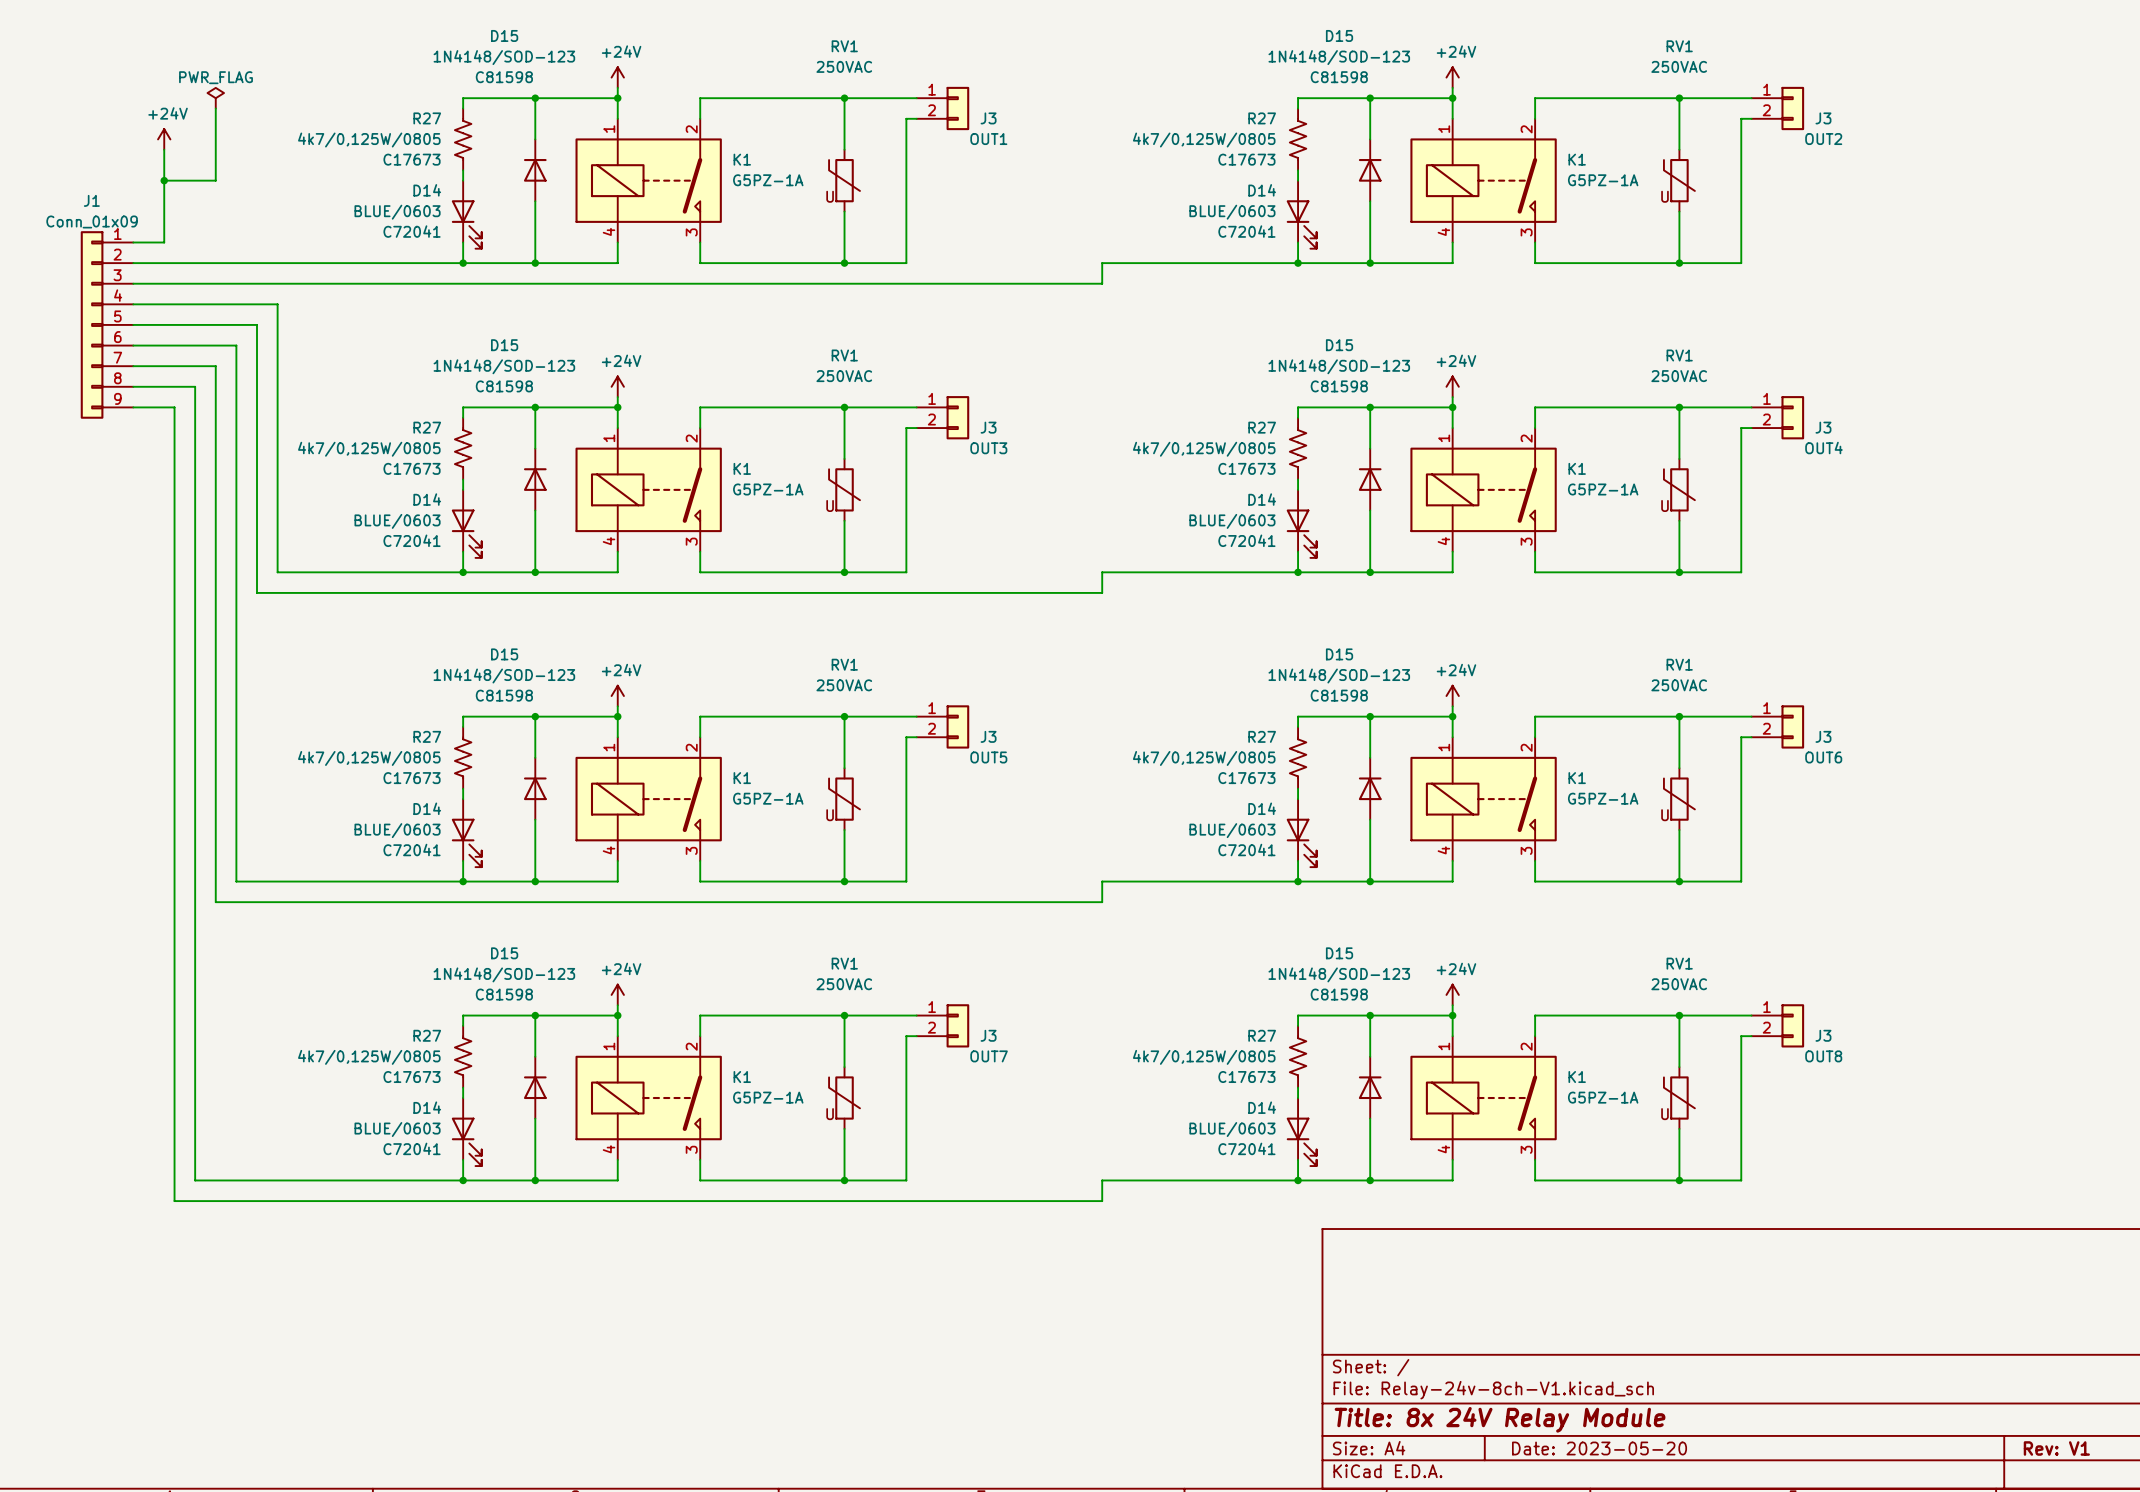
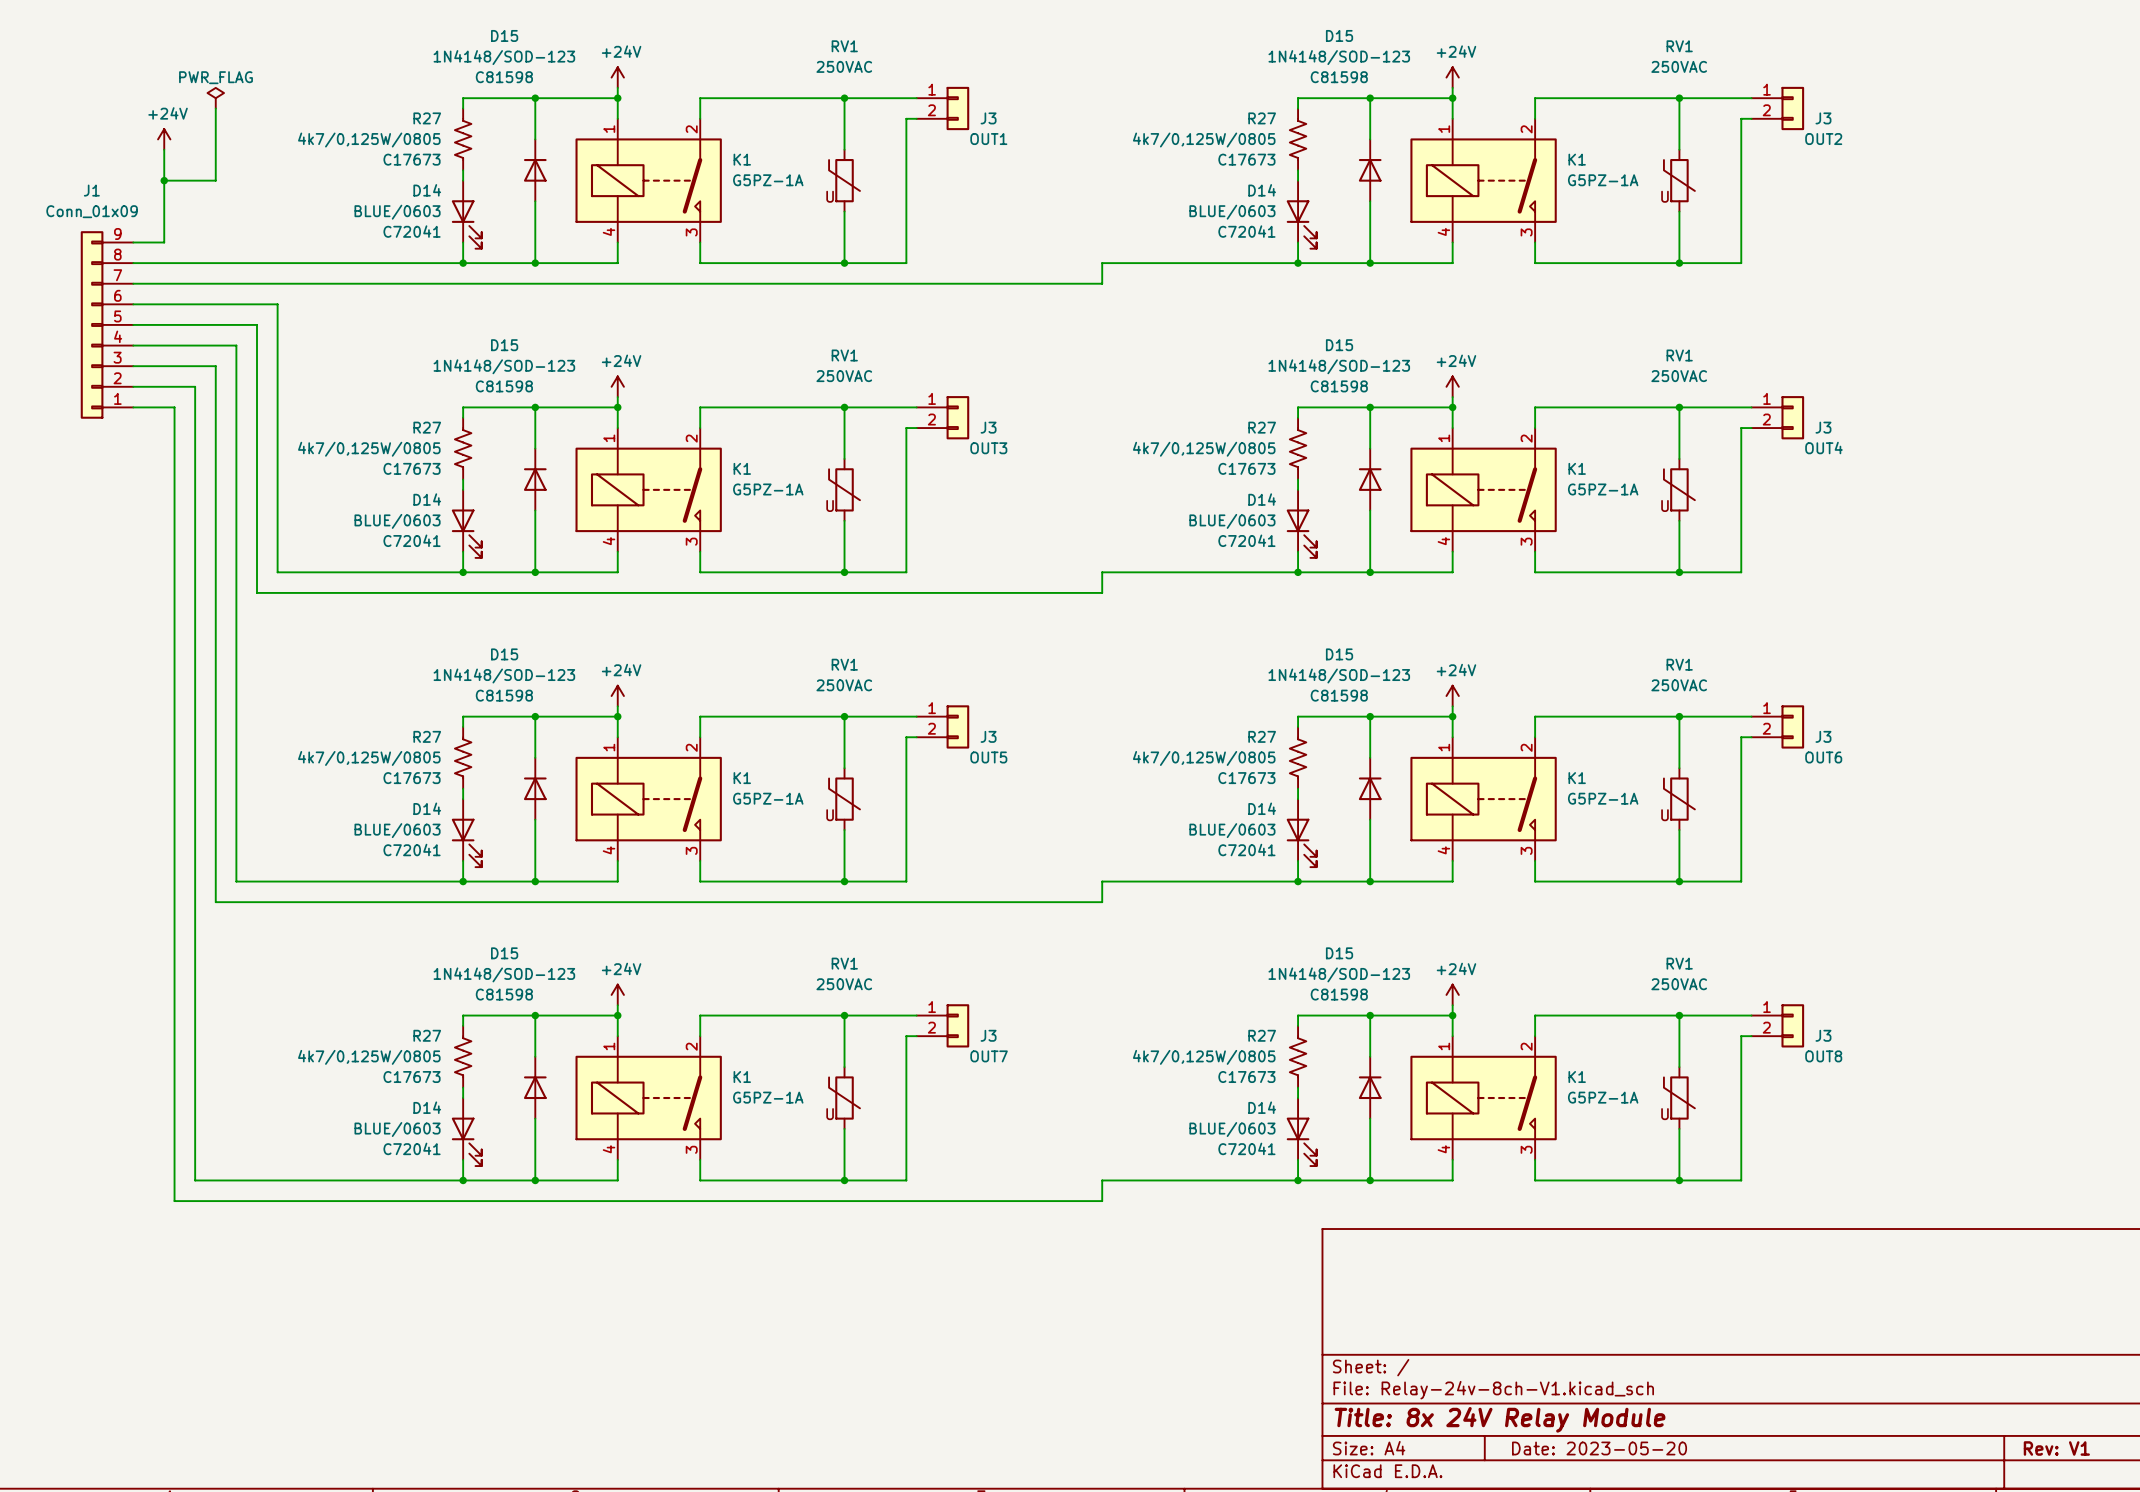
J1 flip: as is (92, 324) -> up-down (92, 324)

